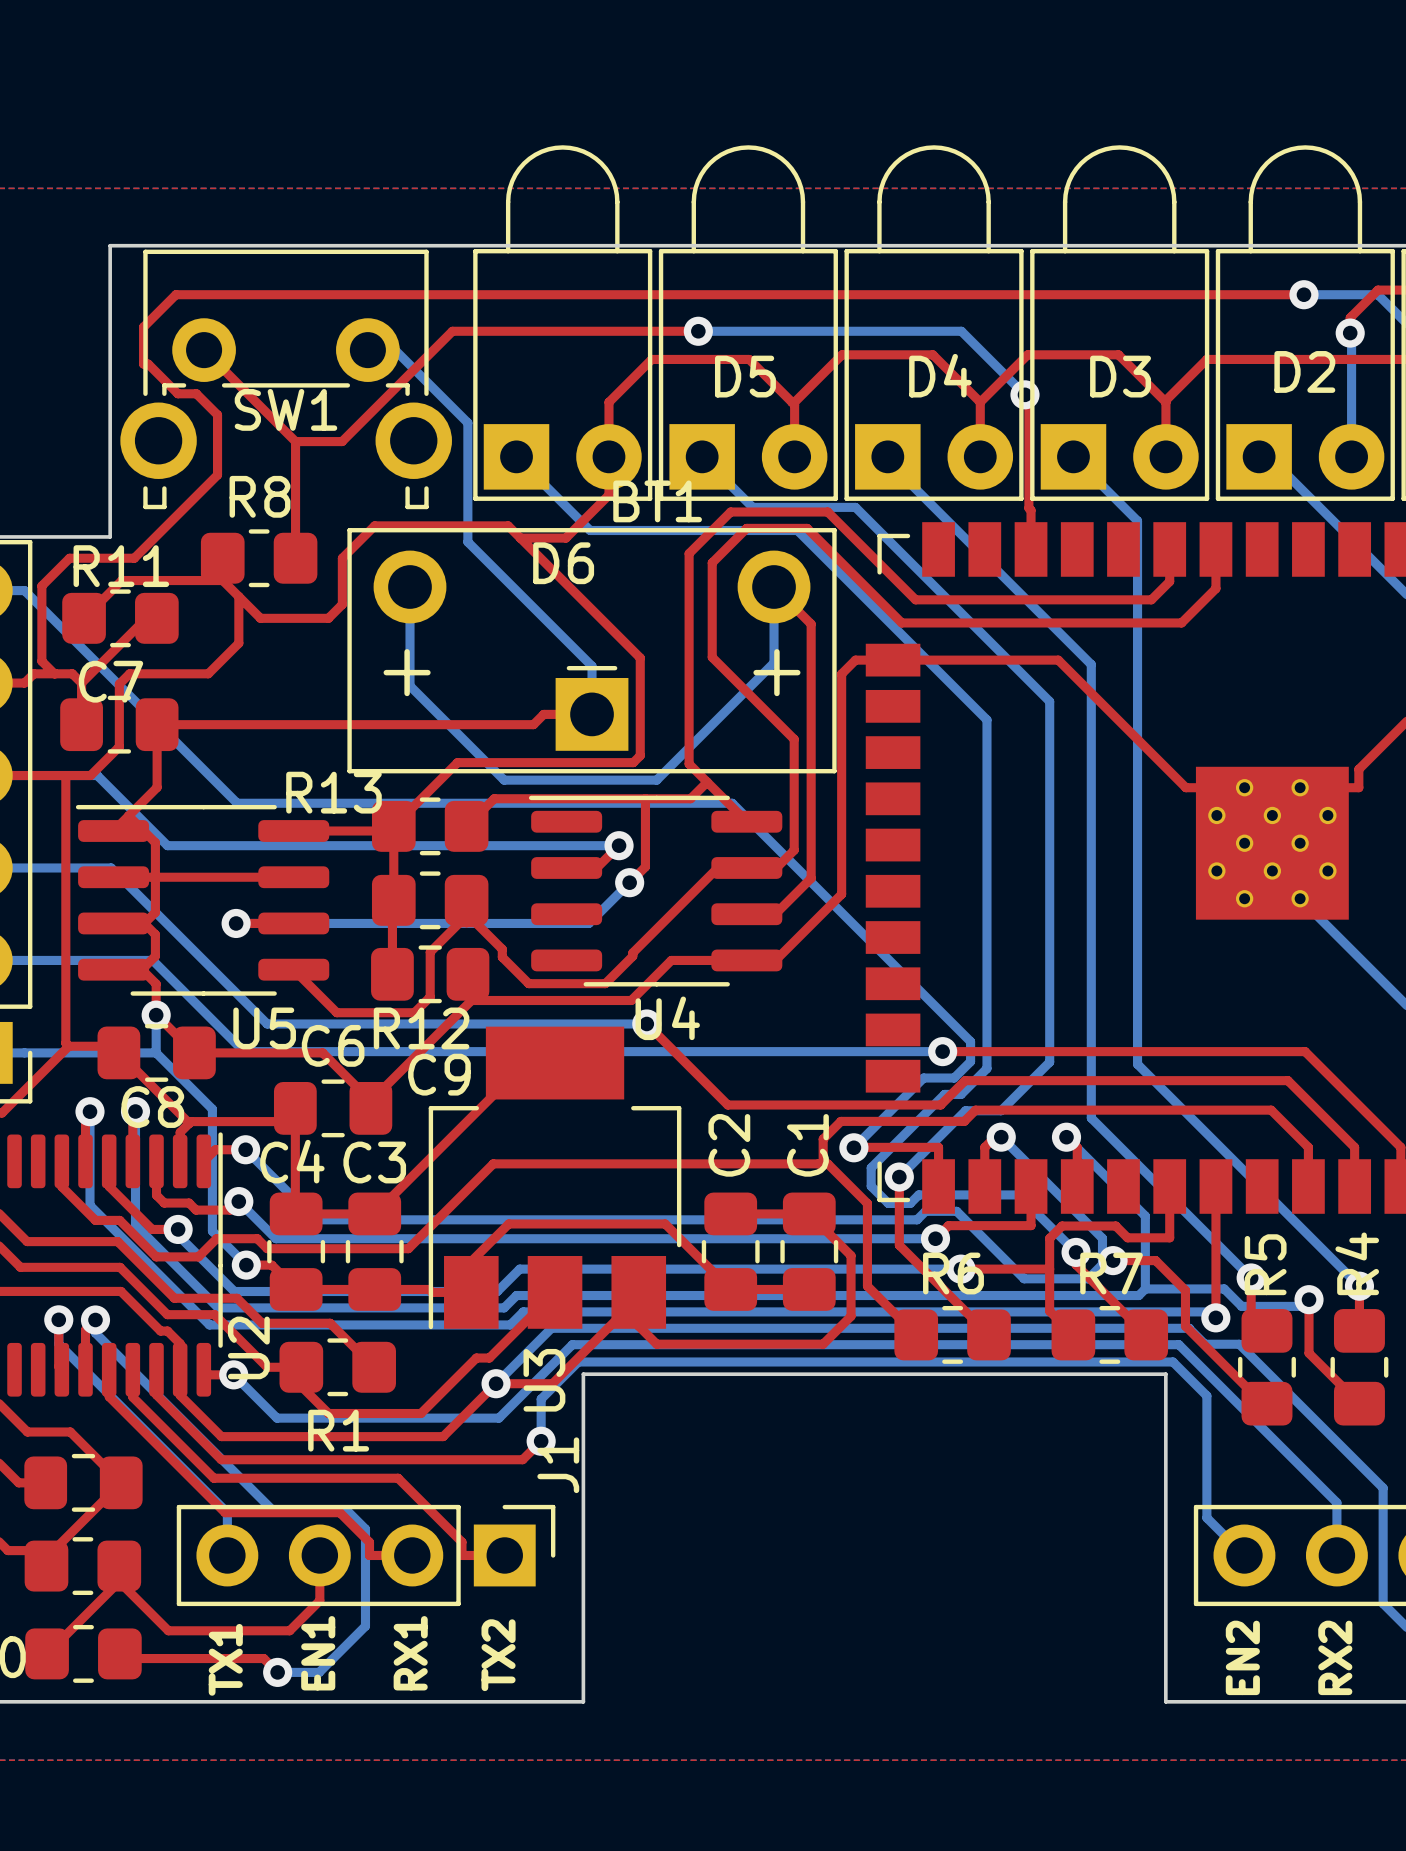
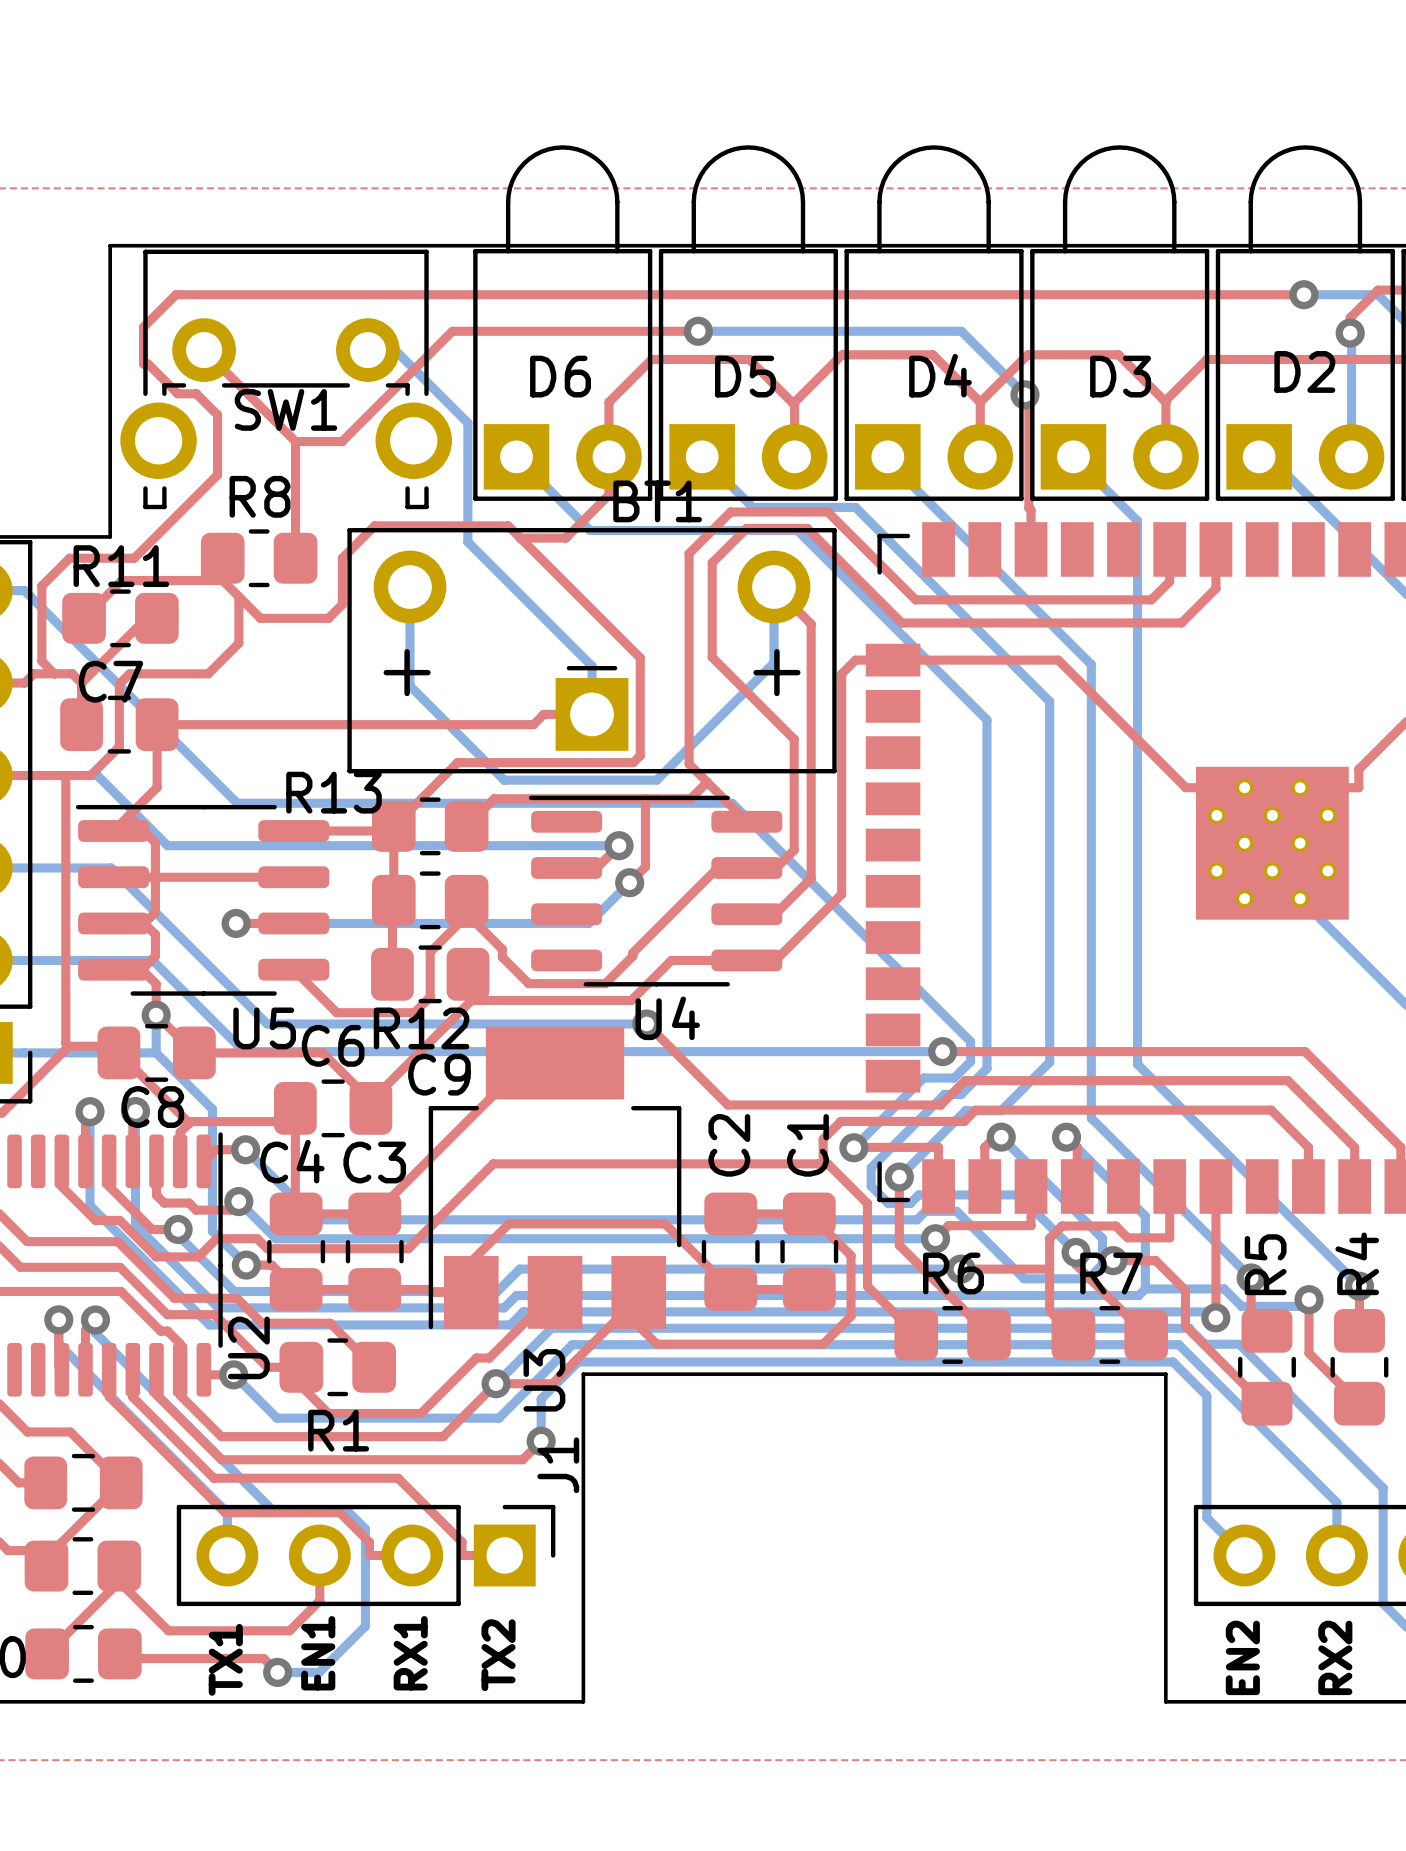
D6 name position: D6 (563, 563) -> D6 (560, 376)

